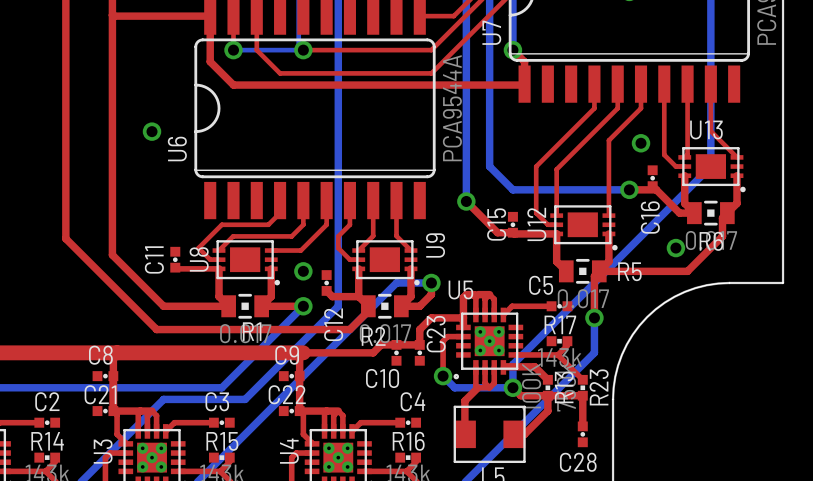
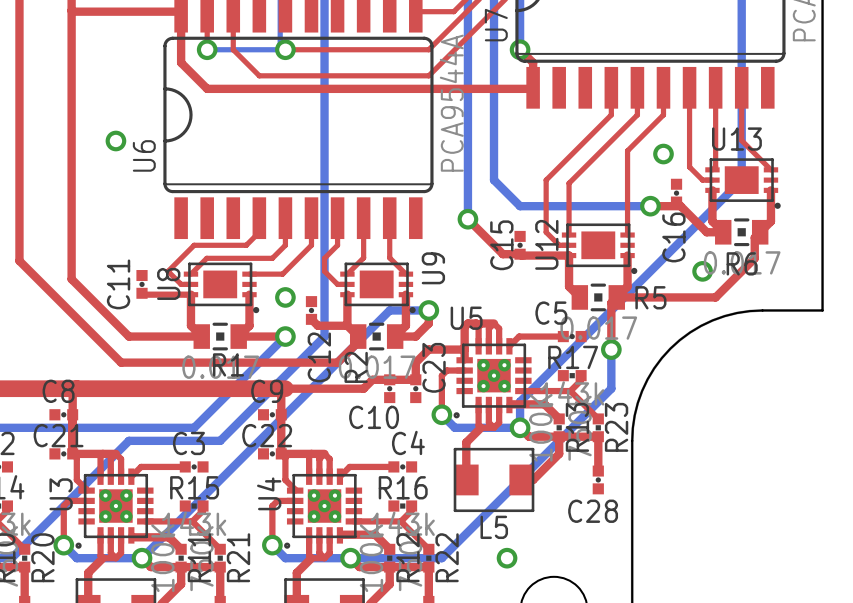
R2 name rotation: 0° (373, 336) -> 90° counterclockwise (356, 367)

